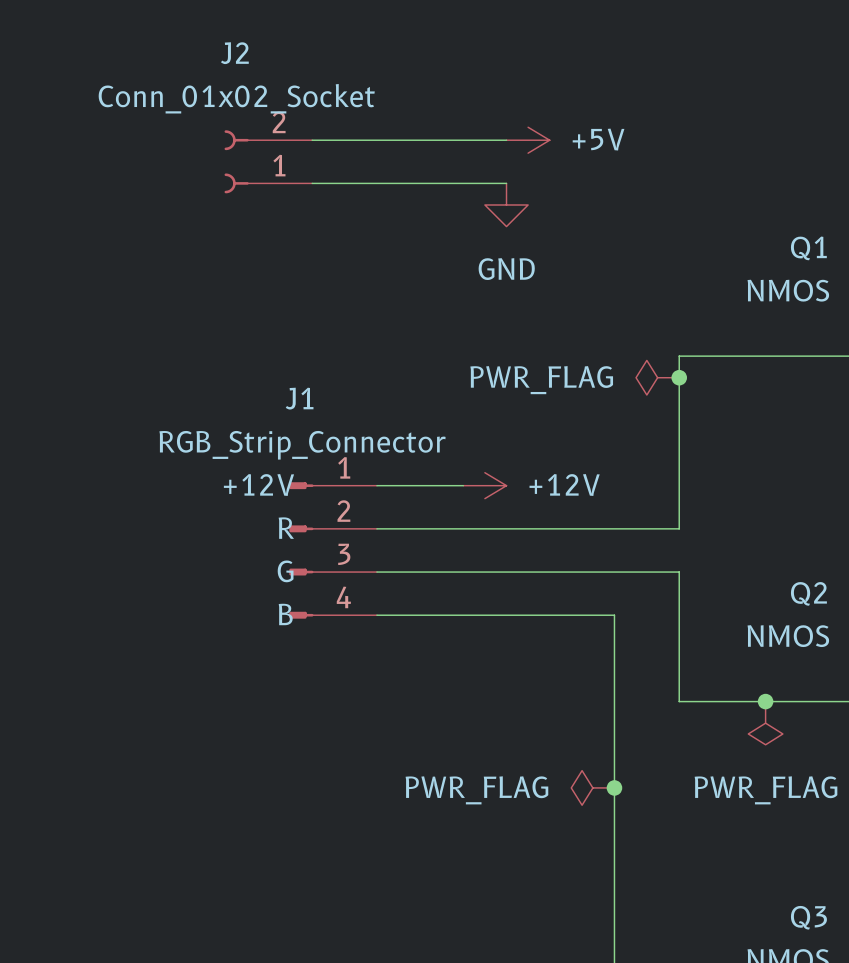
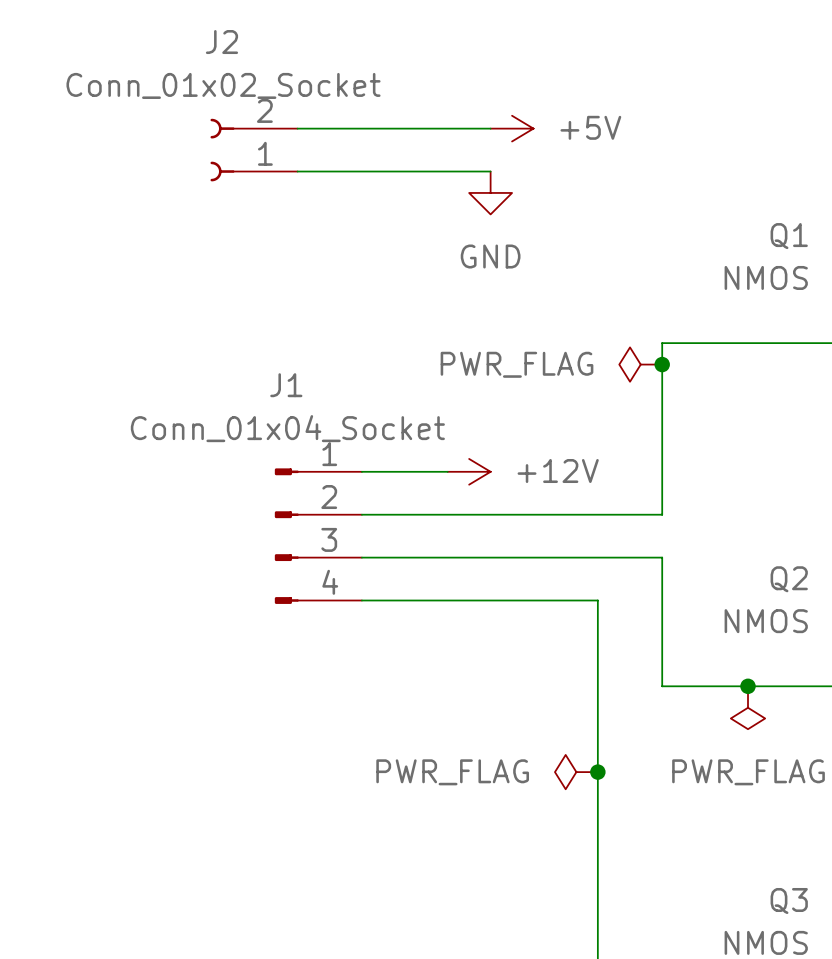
J1 value: RGB_Strip_Connector (302, 445) -> Conn_01x04_Socket (287, 428)
J1 pin name: +12V (258, 485) -> none
J1 pin name: R (286, 528) -> none
J1 pin name: G (285, 571) -> none
J1 pin name: B (285, 614) -> none

